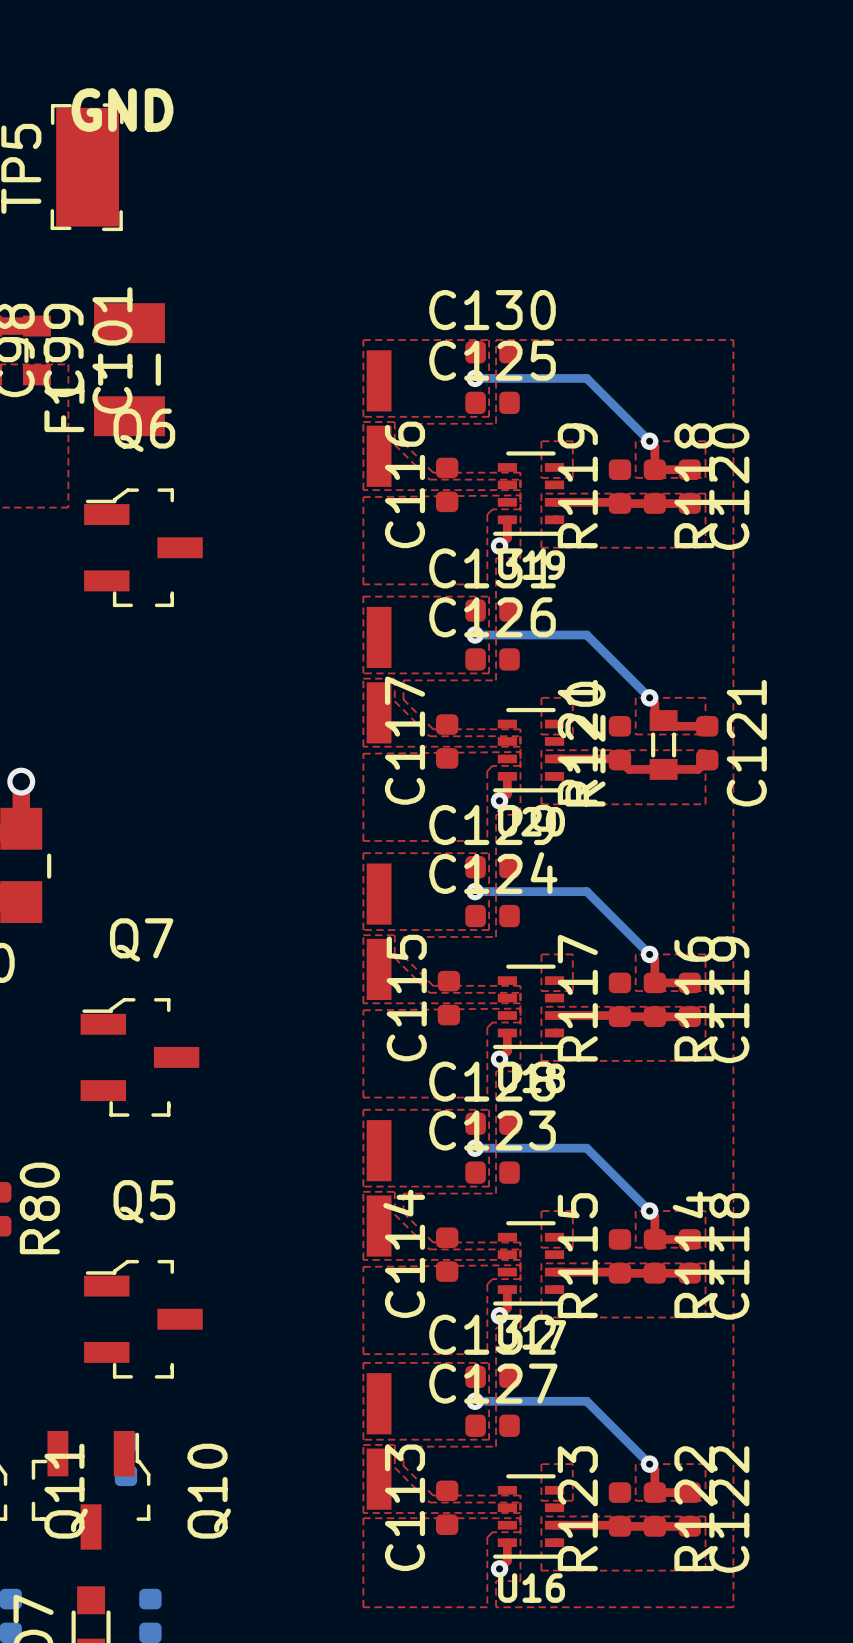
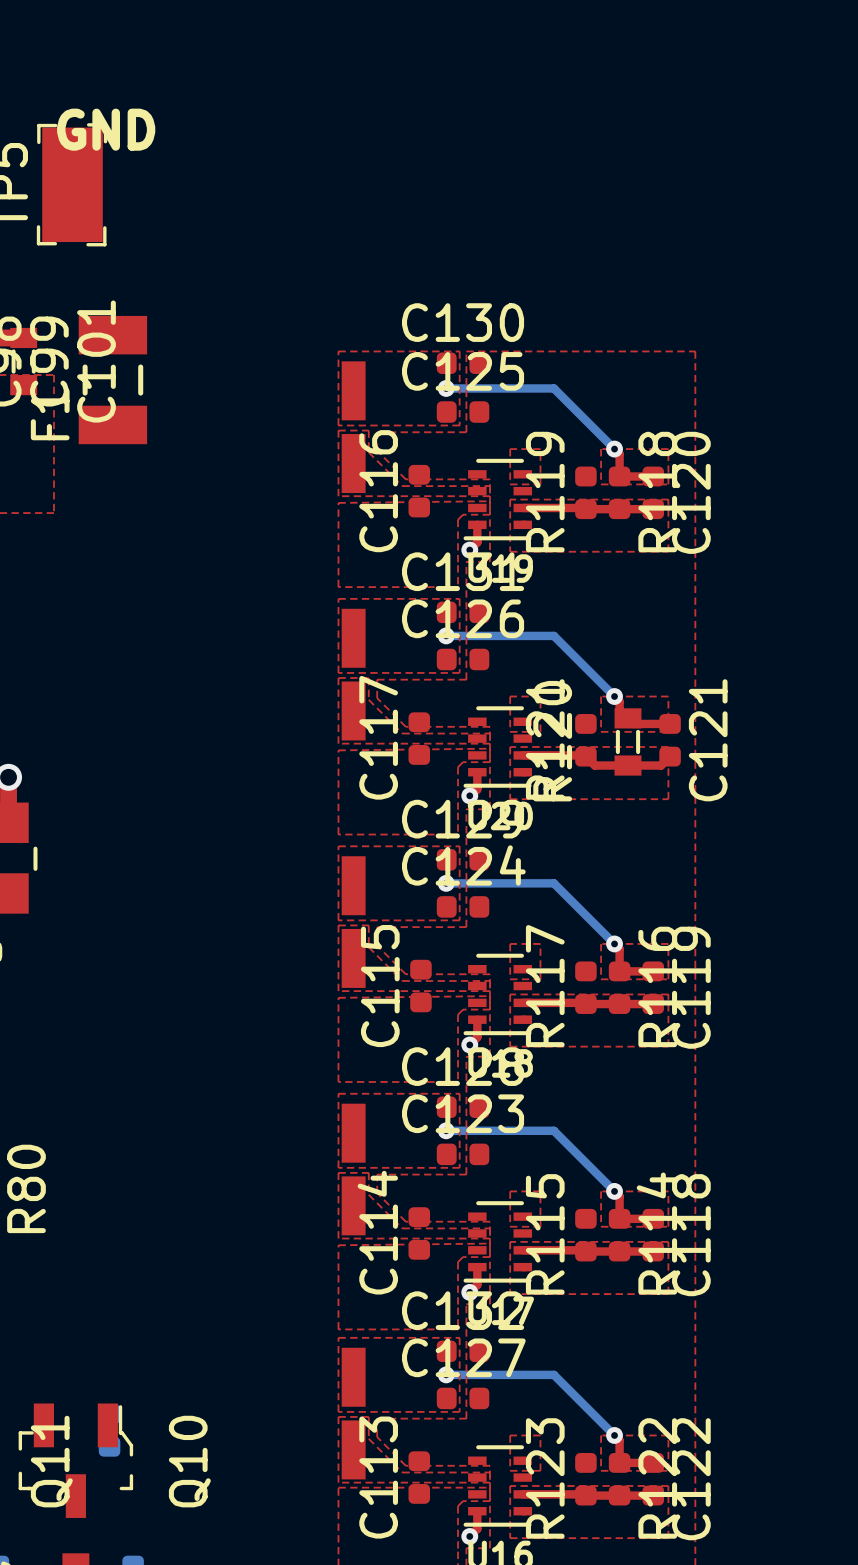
Q6: (143, 547) -> none
Q7: (139, 1057) -> none
Q5: (143, 1319) -> none

